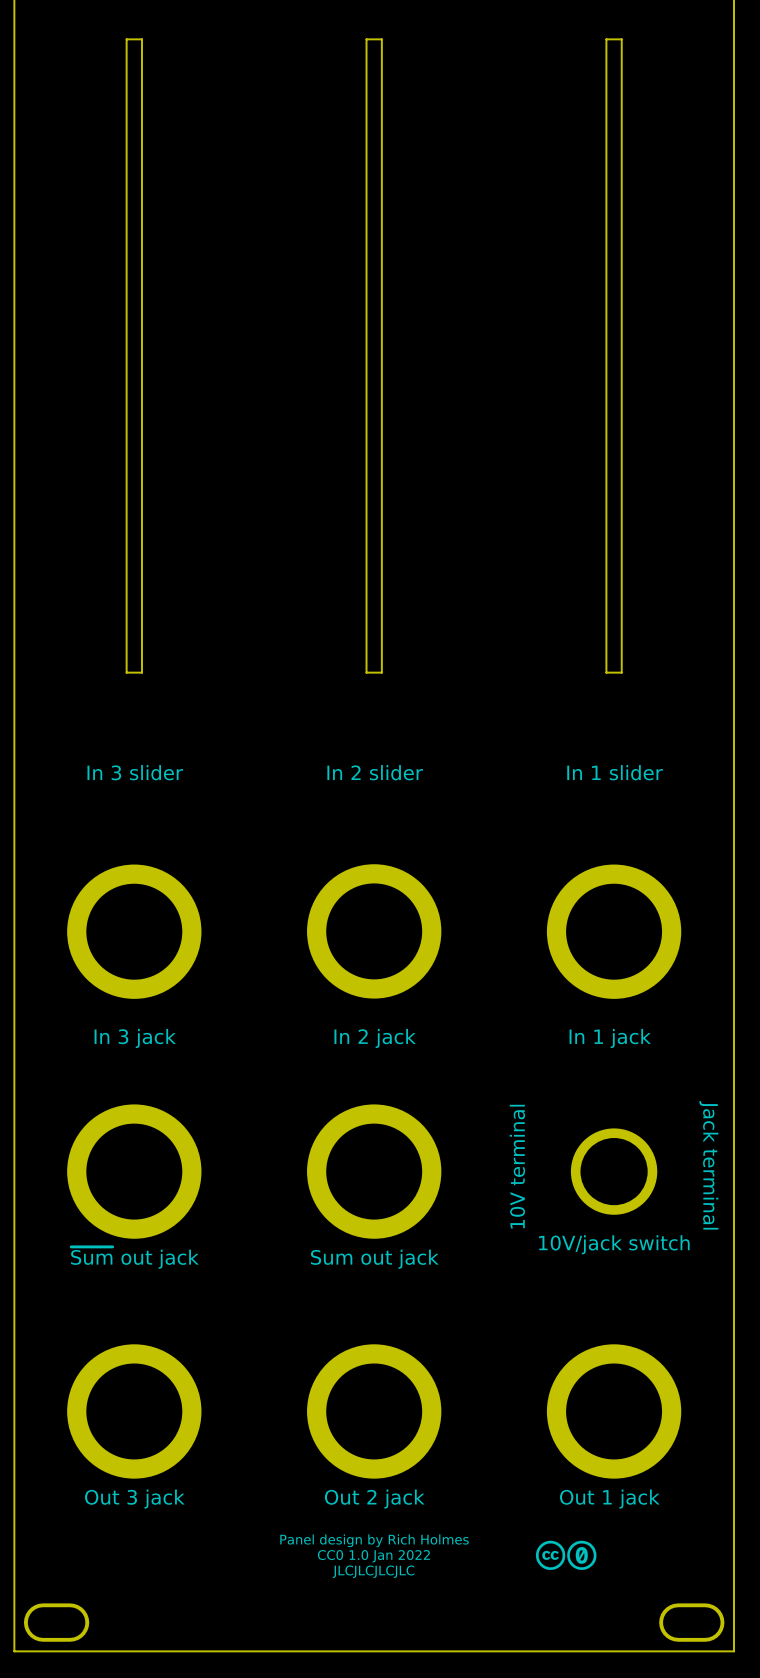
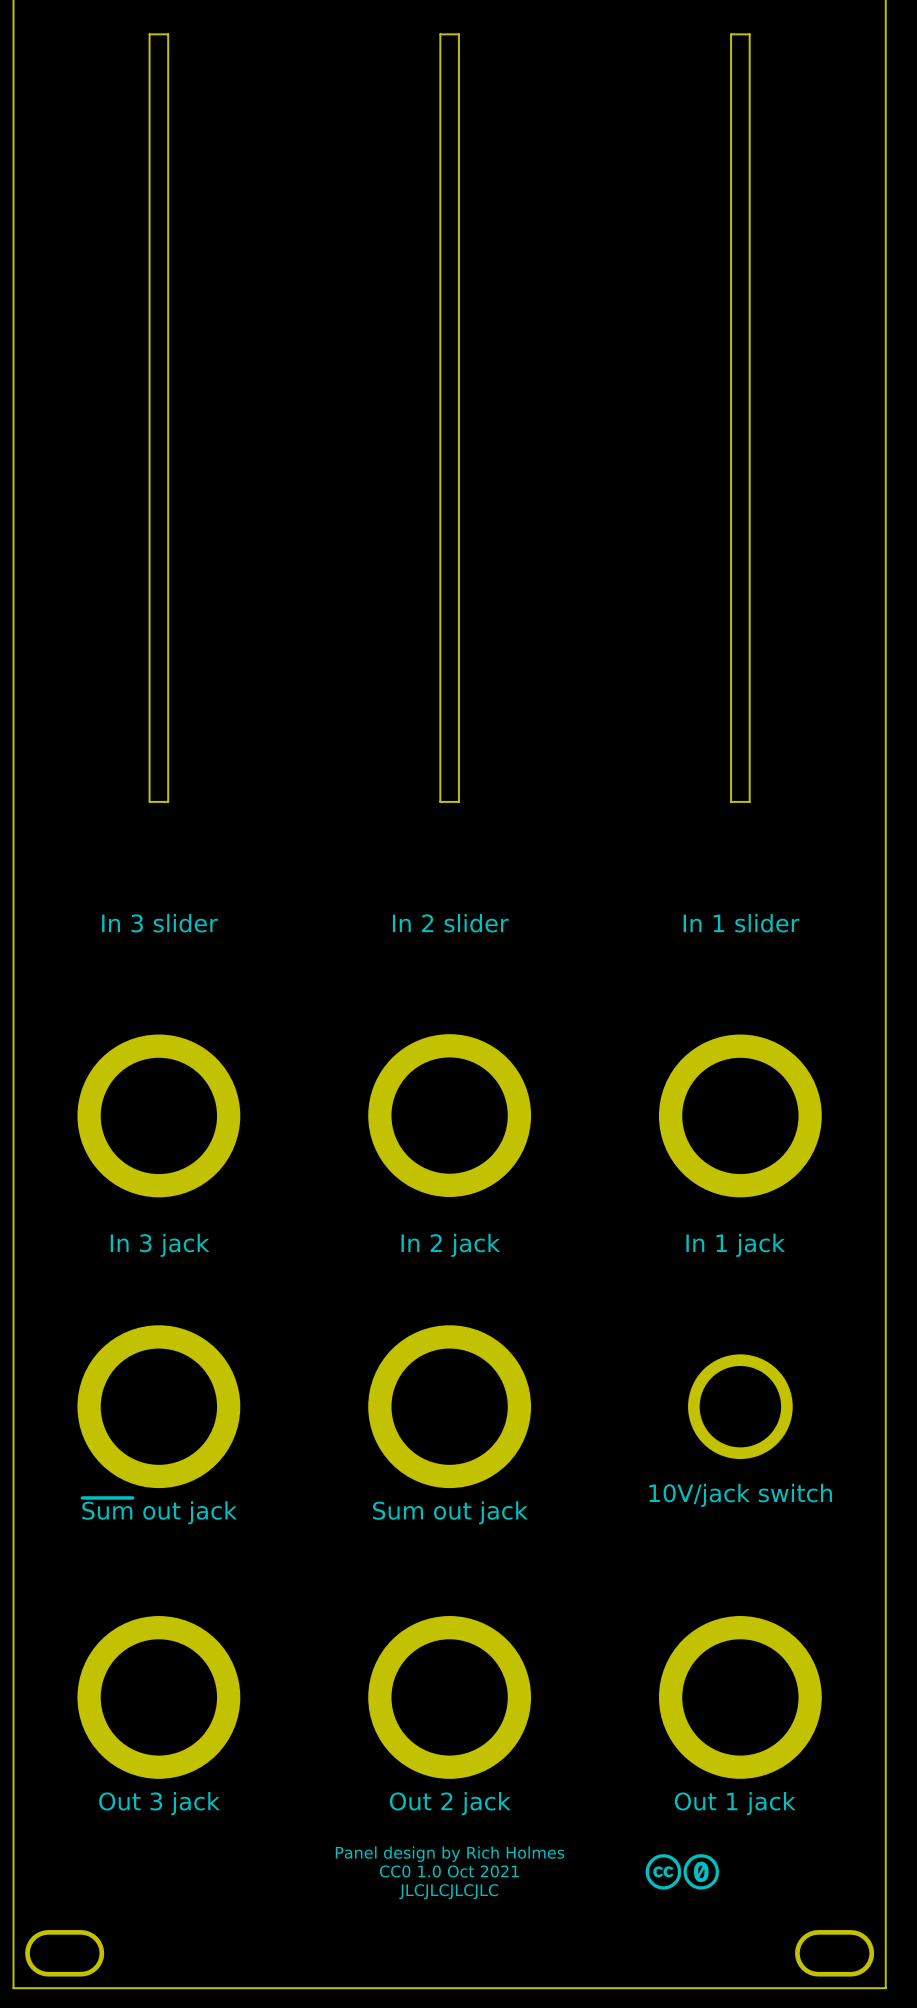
text: Jack terminal (708, 1165) -> none
text: 10V terminal (517, 1166) -> none
text: CC0 1.0 Jan 2022 (373, 1556) -> CC0 1.0 Oct 2021 (449, 1871)

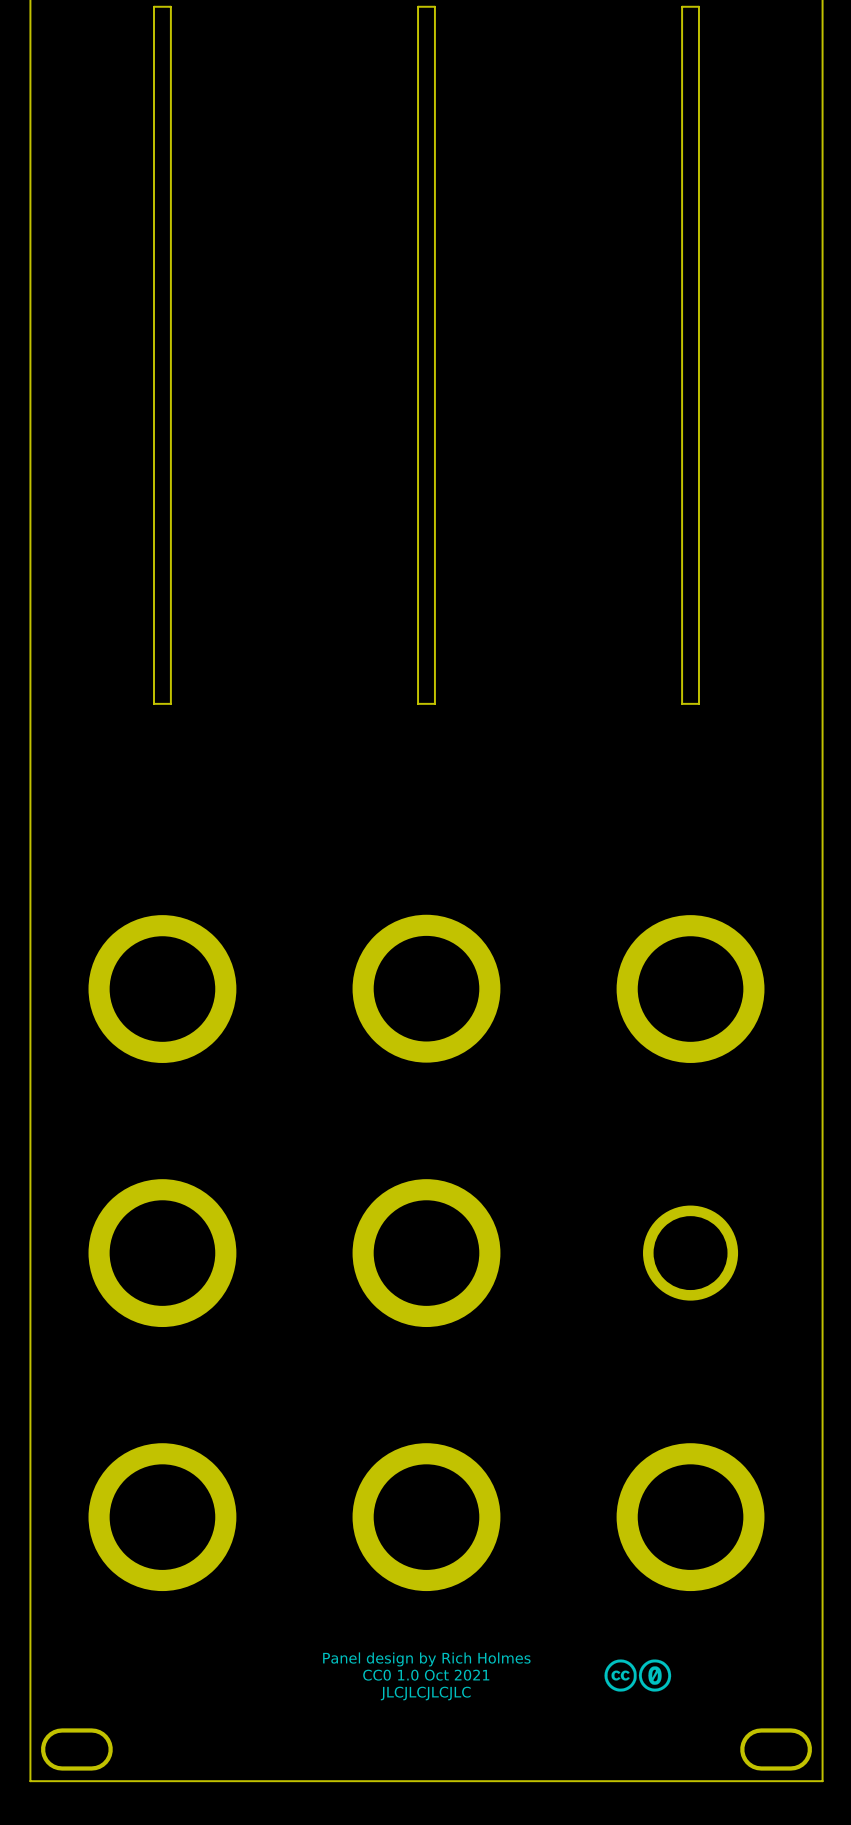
text: In 3 slider (160, 923) -> none
text: In 2 slider (450, 923) -> none
text: In 1 slider (741, 923) -> none
text: In 3 jack (160, 1245) -> none
text: In 2 jack (450, 1245) -> none
text: In 1 jack (735, 1245) -> none
text: 10V/jack switch (740, 1495) -> none
text: ~{Sum} out jack (159, 1511) -> none
text: Sum out jack (450, 1512) -> none
text: Out 3 jack (159, 1803) -> none
text: Out 2 jack (450, 1803) -> none
text: Out 1 jack (735, 1803) -> none

